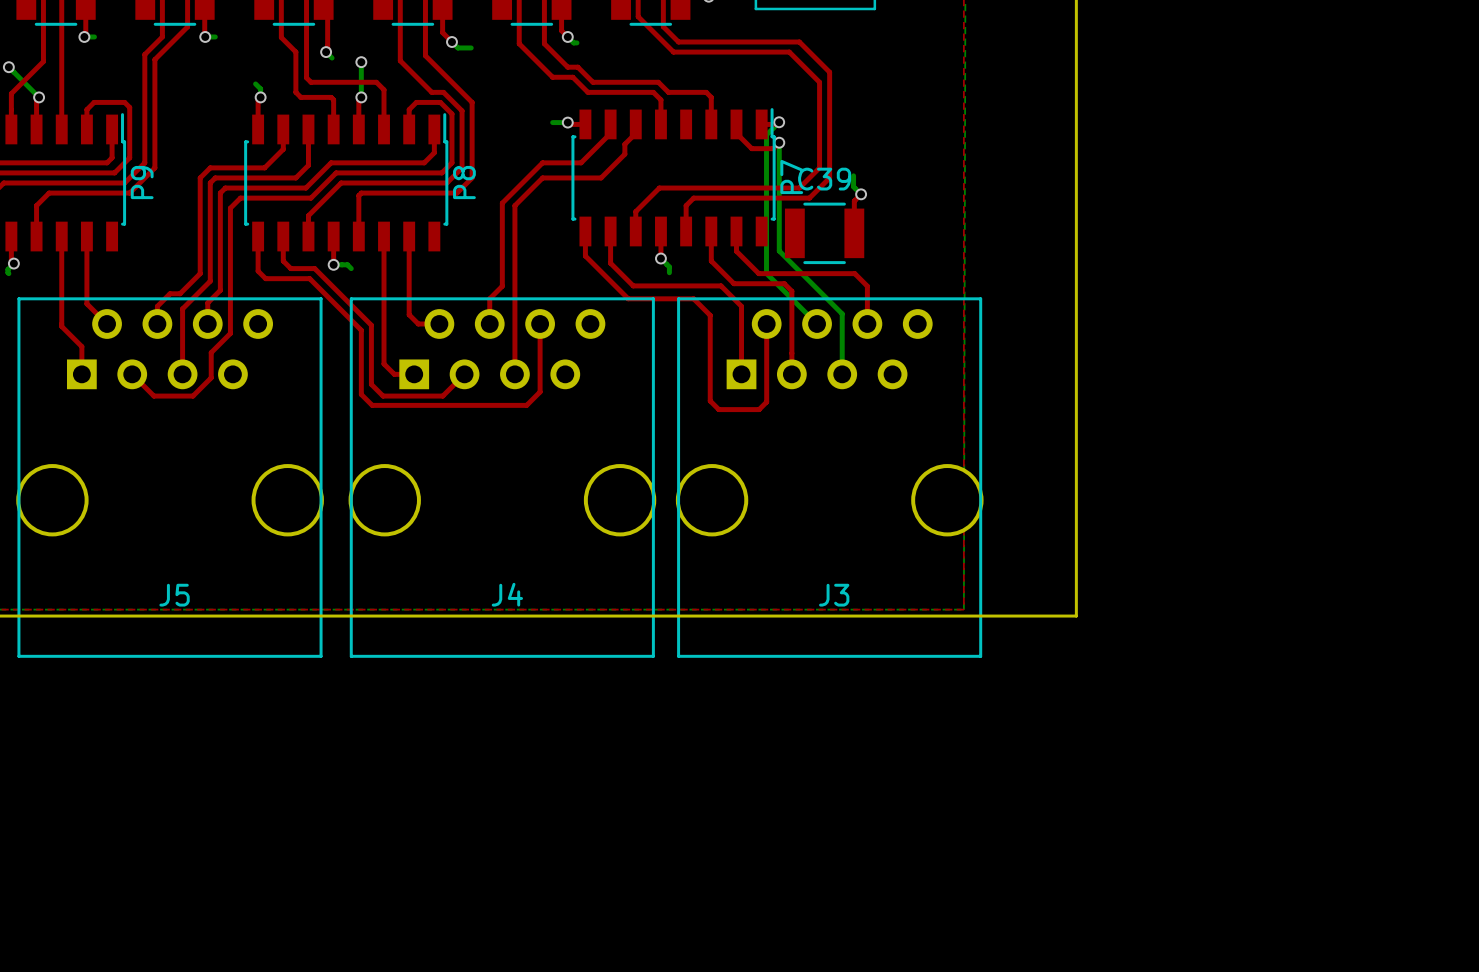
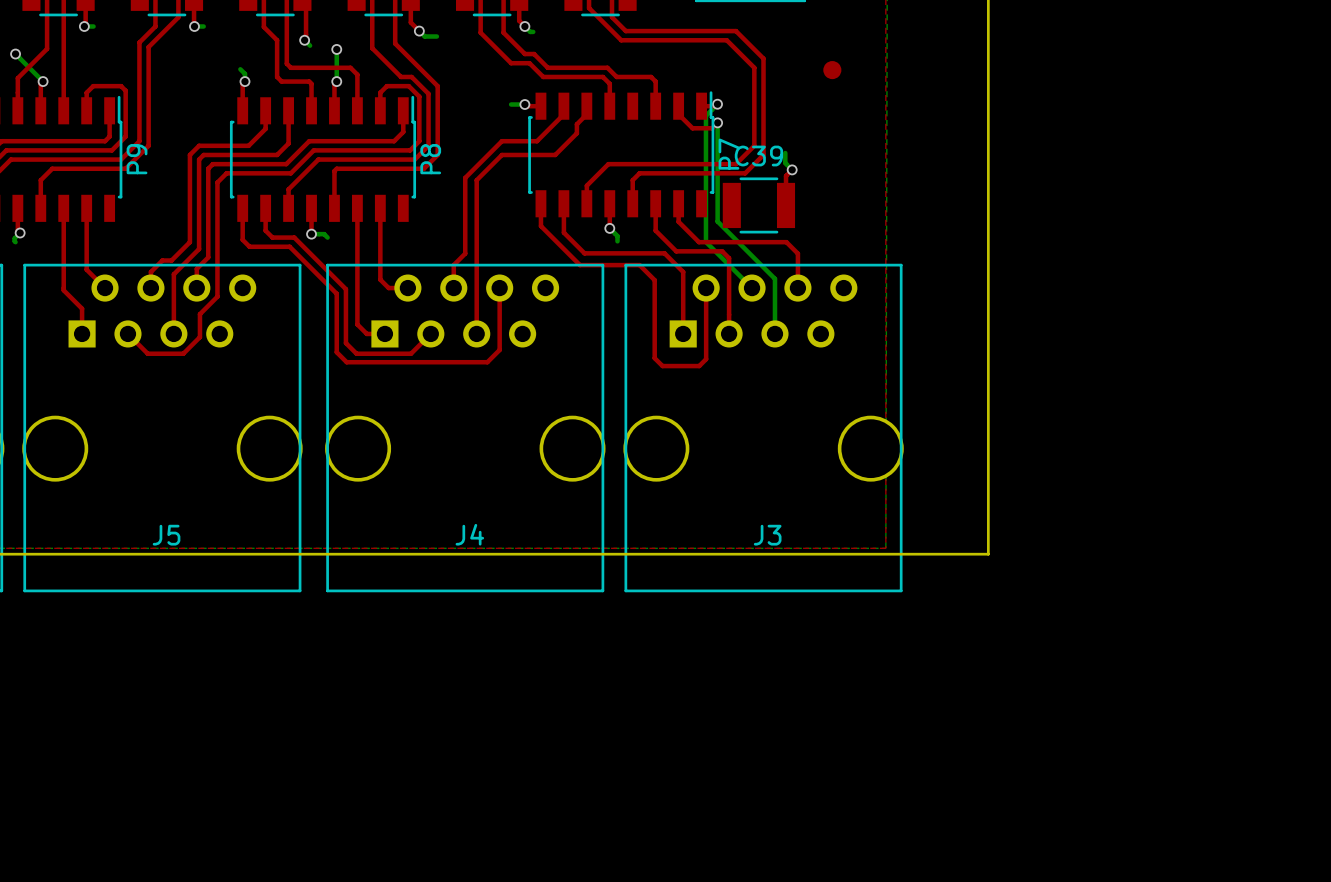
part: none -> (832, 70)

